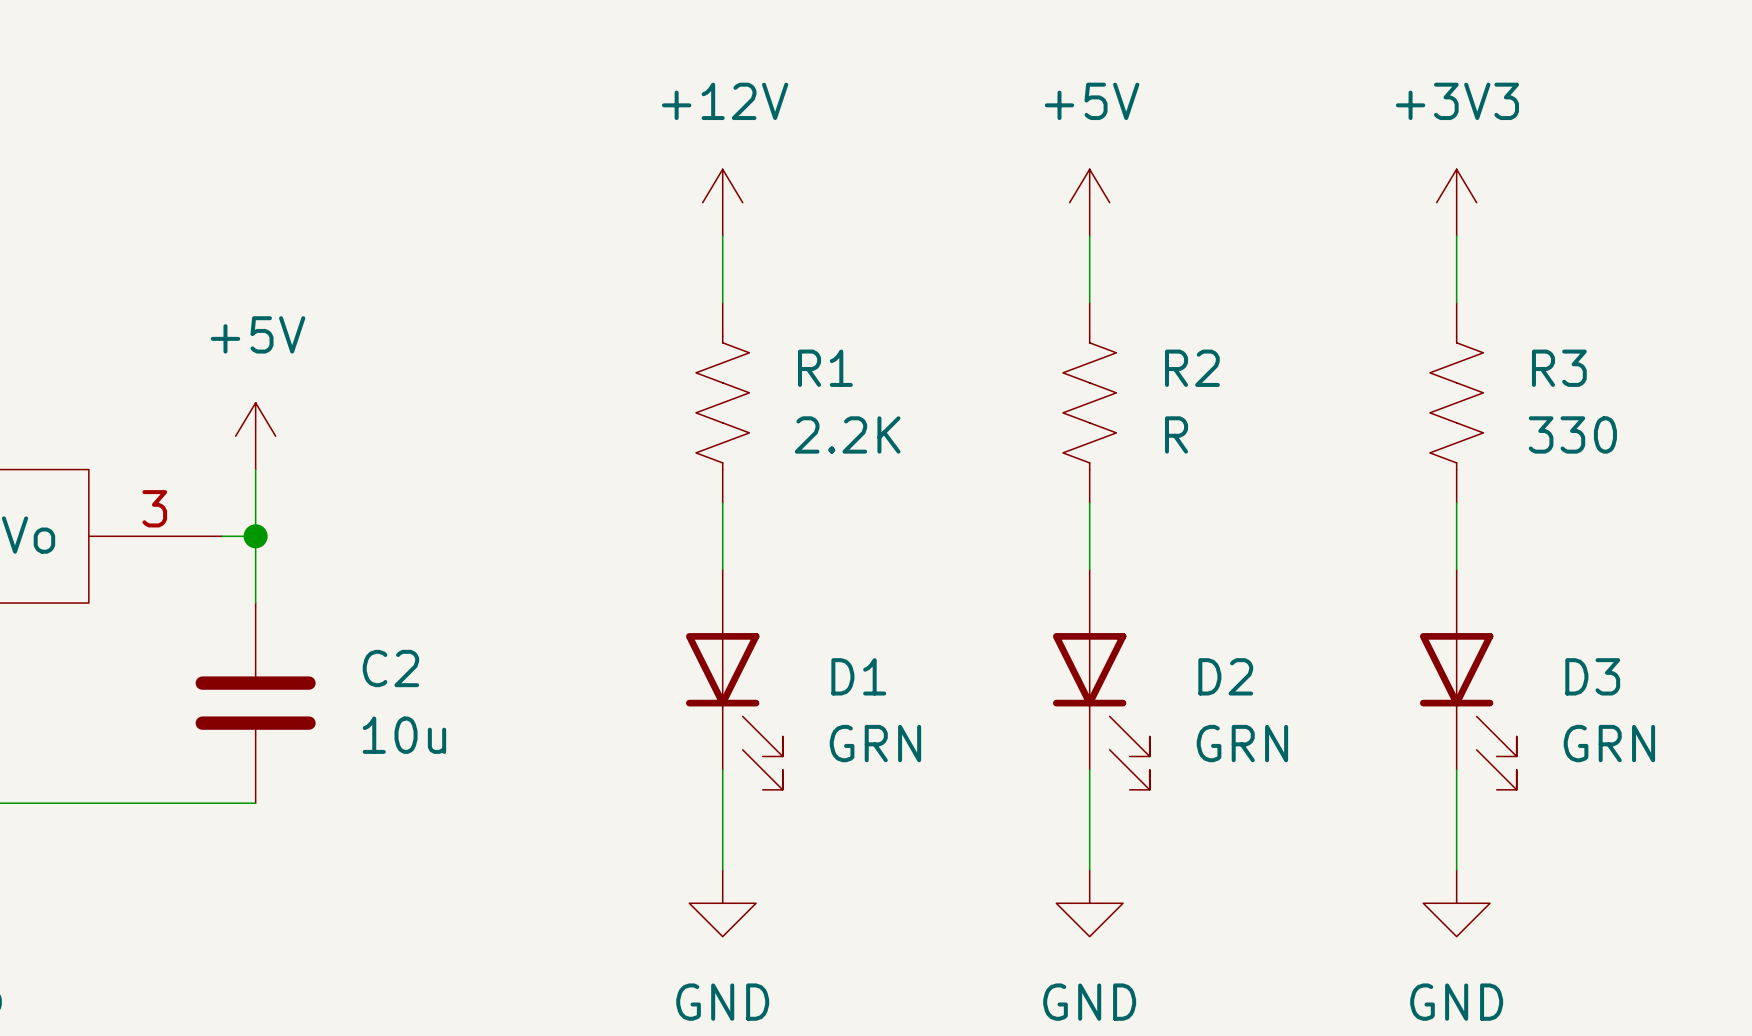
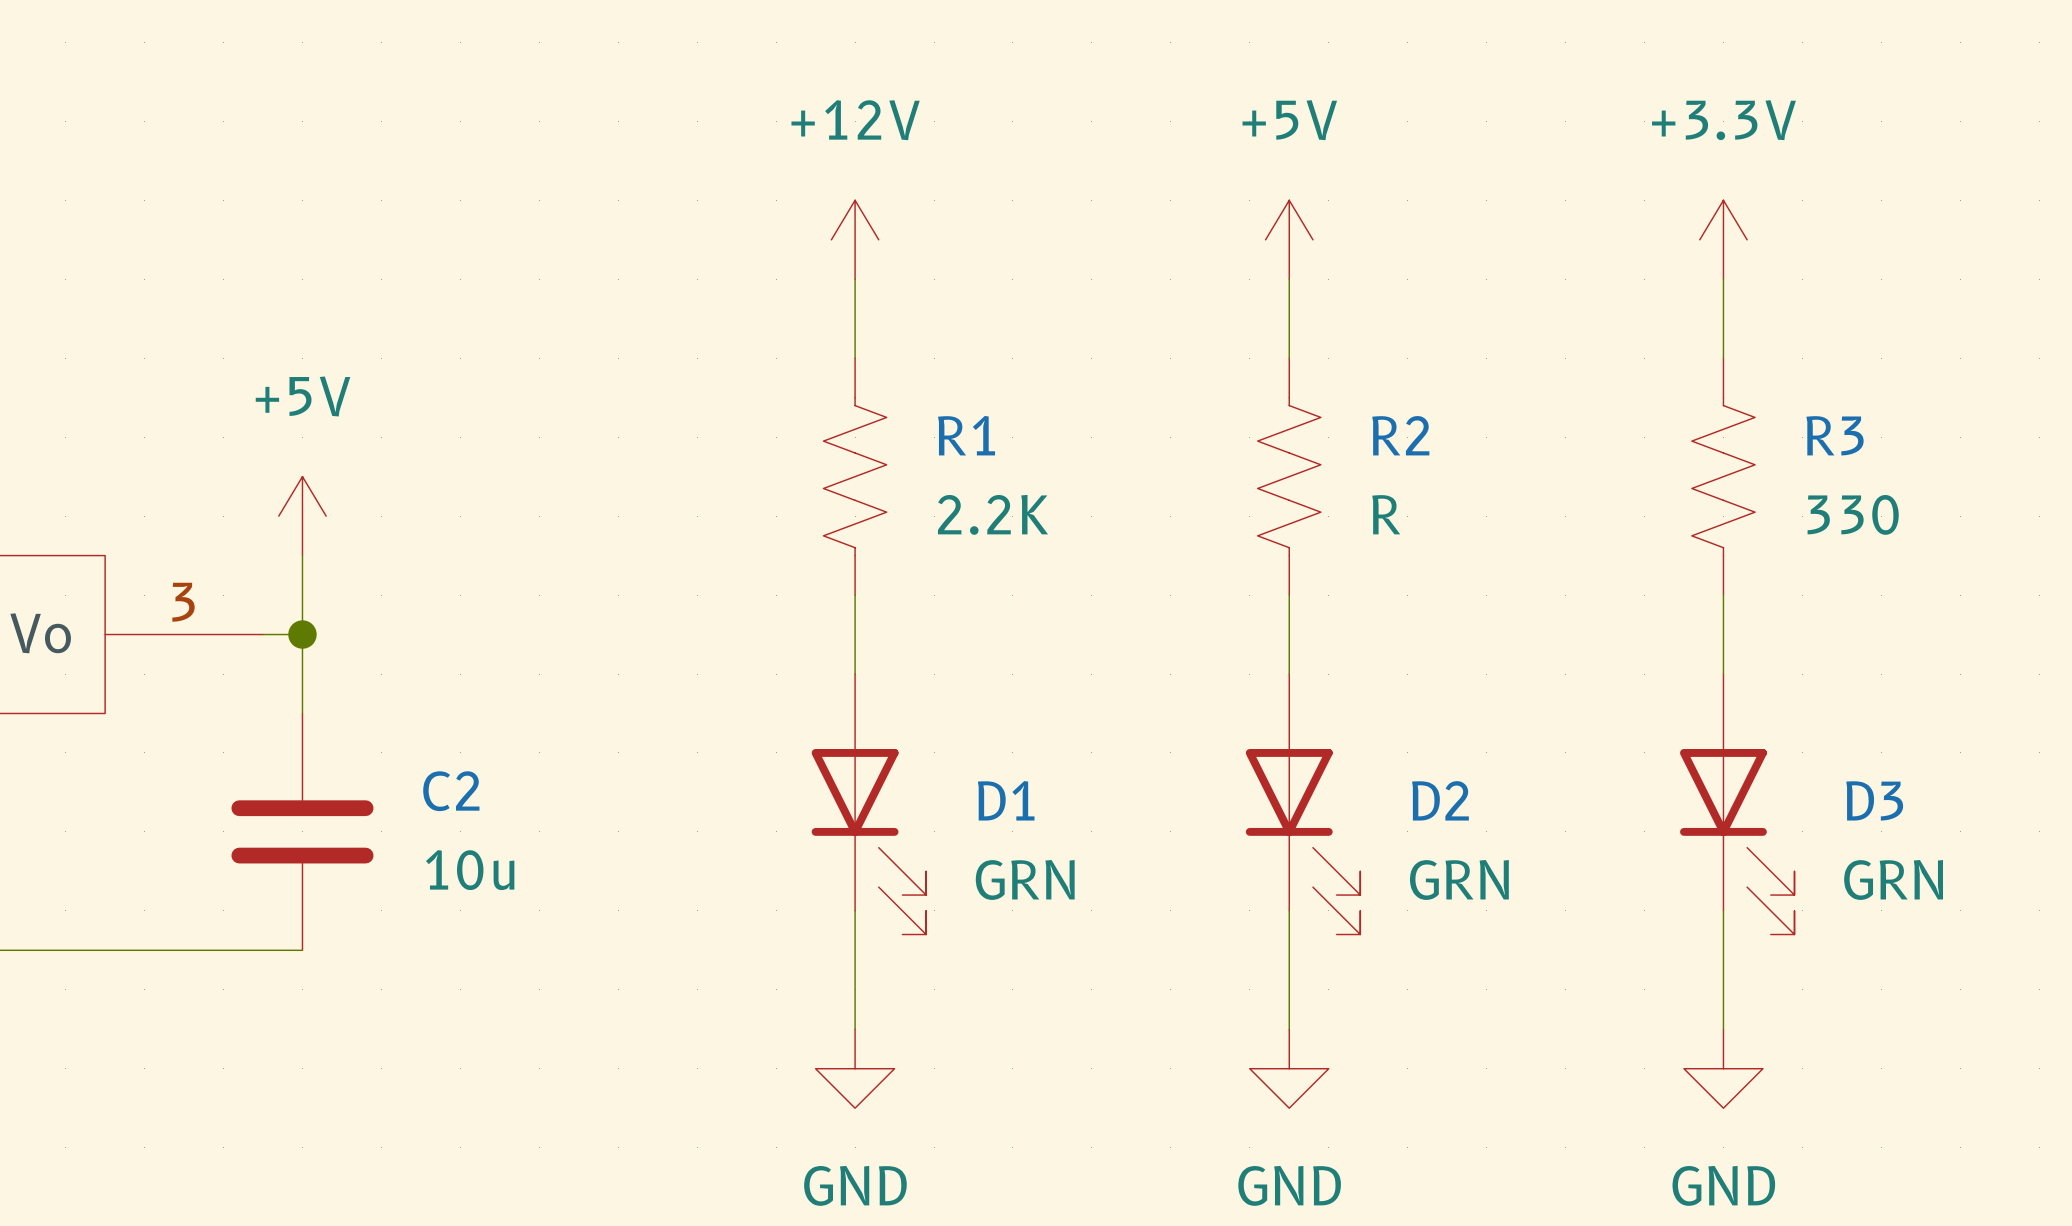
power symbol: +3V3 (1456, 202) -> +3.3V (1723, 239)

